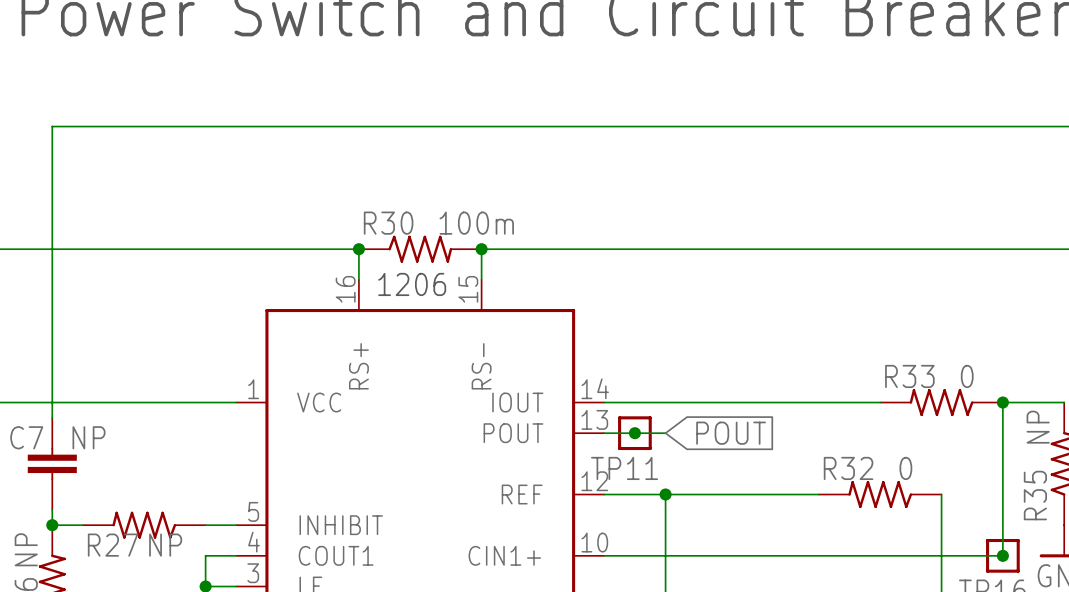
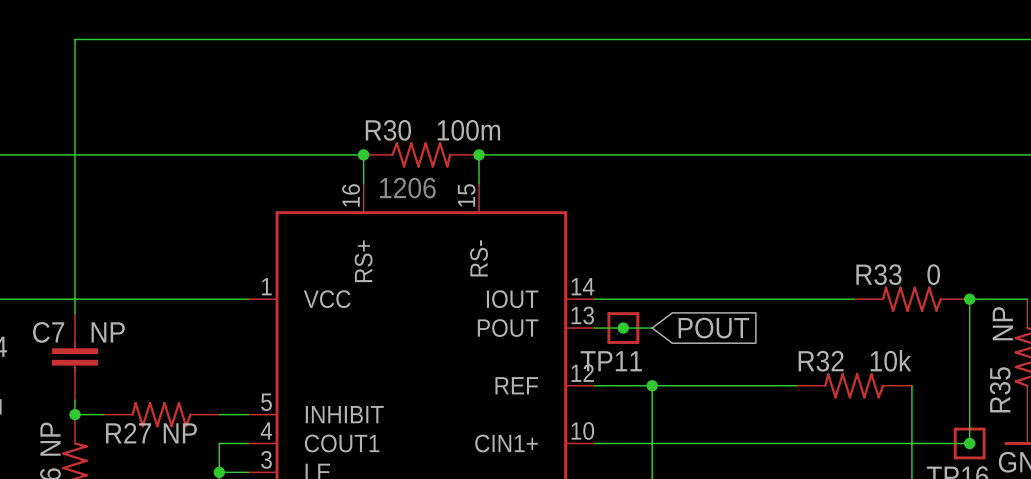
R32 value: 0 (905, 468) -> 10k (890, 360)

